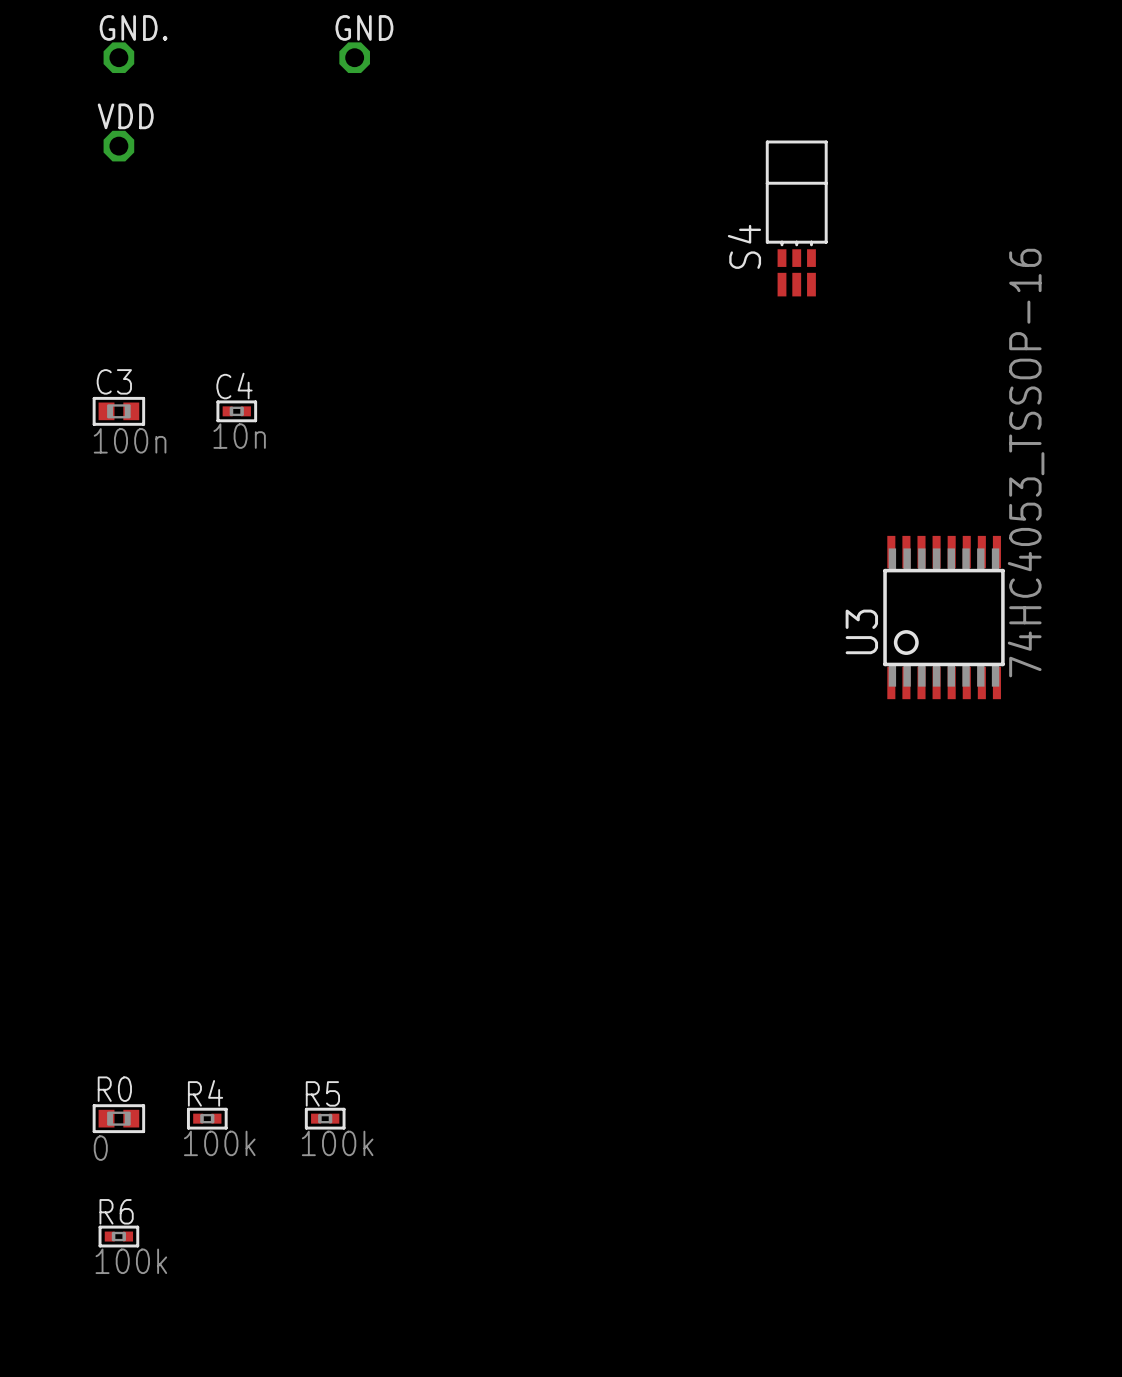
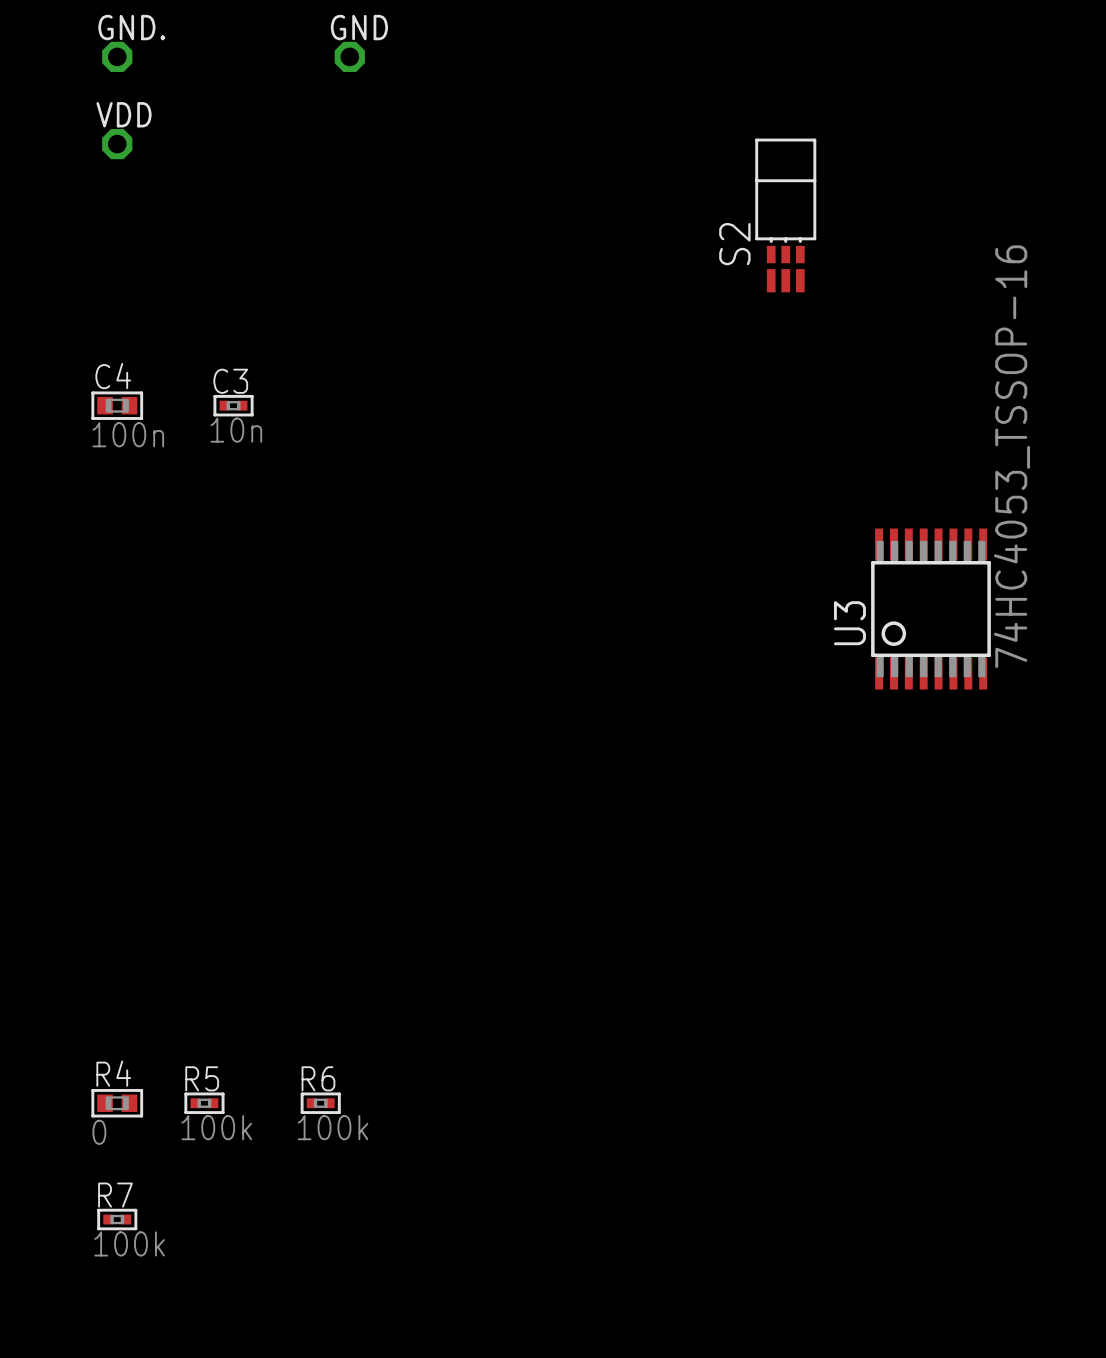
S4 name: S4 (744, 246) -> S2 (734, 244)
C3 name: C3 (114, 381) -> C4 (113, 376)
C4 name: C4 (234, 386) -> C3 (230, 381)
R0 name: R0 (114, 1089) -> R4 (113, 1073)
R4 name: R4 (205, 1093) -> R5 (202, 1078)
R5 name: R5 (322, 1093) -> R6 (318, 1078)
R6 name: R6 (116, 1211) -> R7 (115, 1195)

